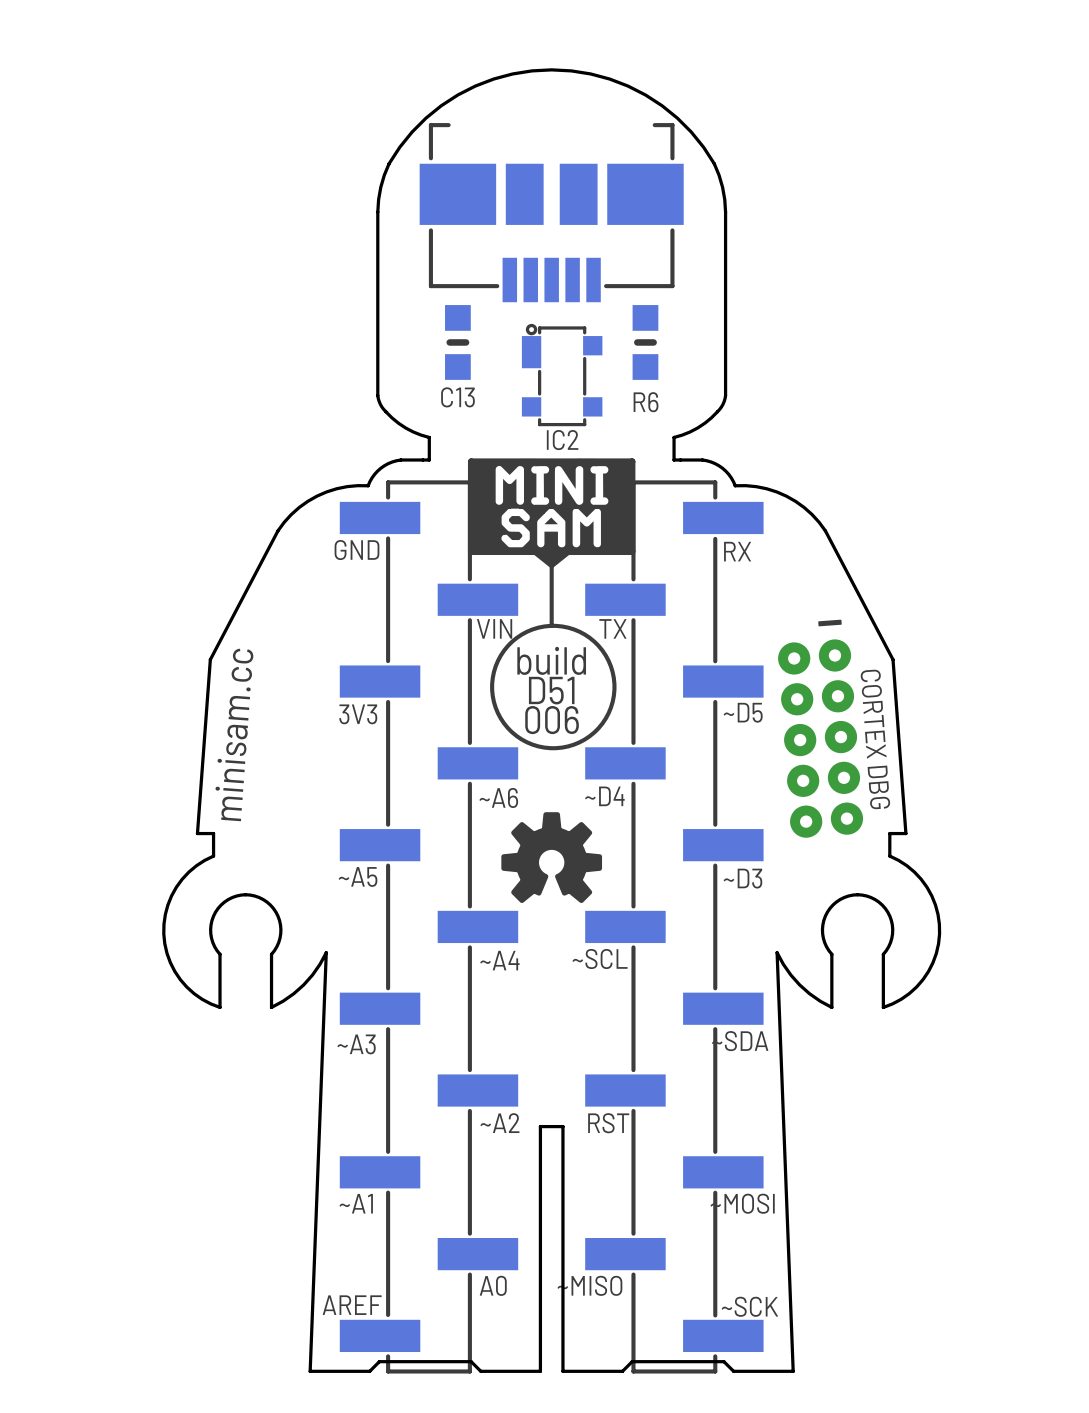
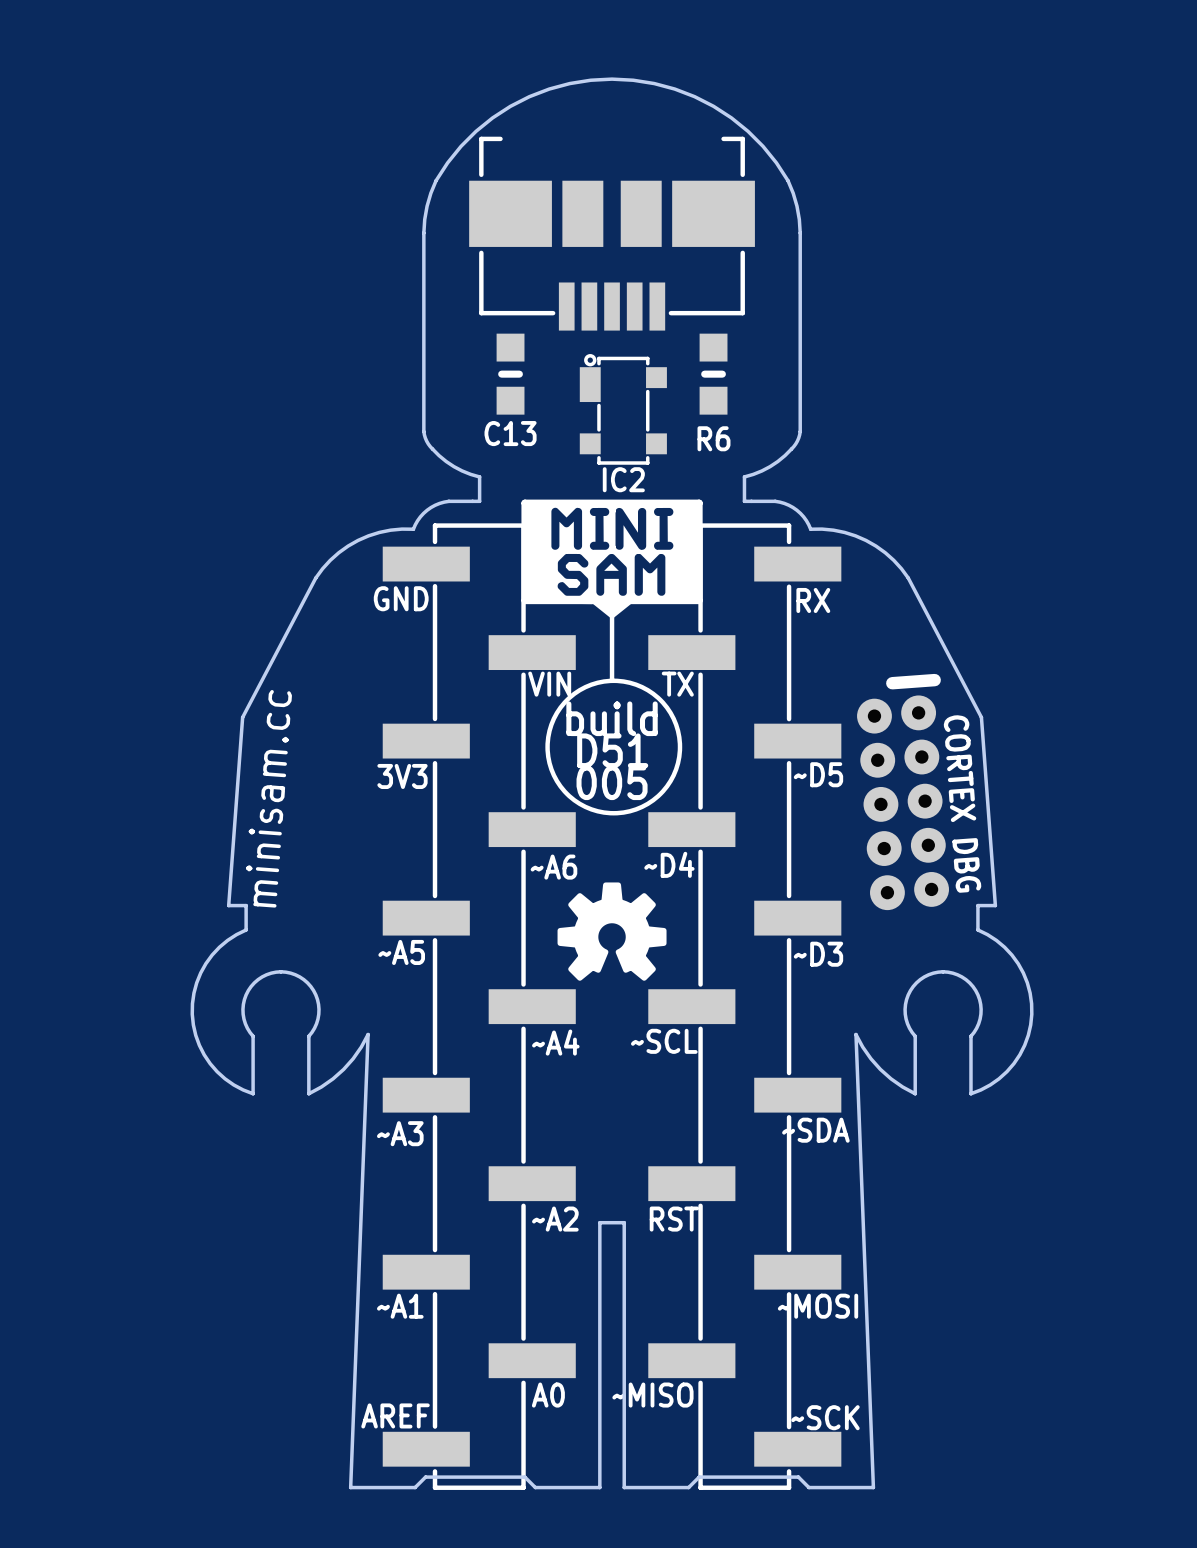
text: 006 (552, 720) -> 005 (612, 782)

